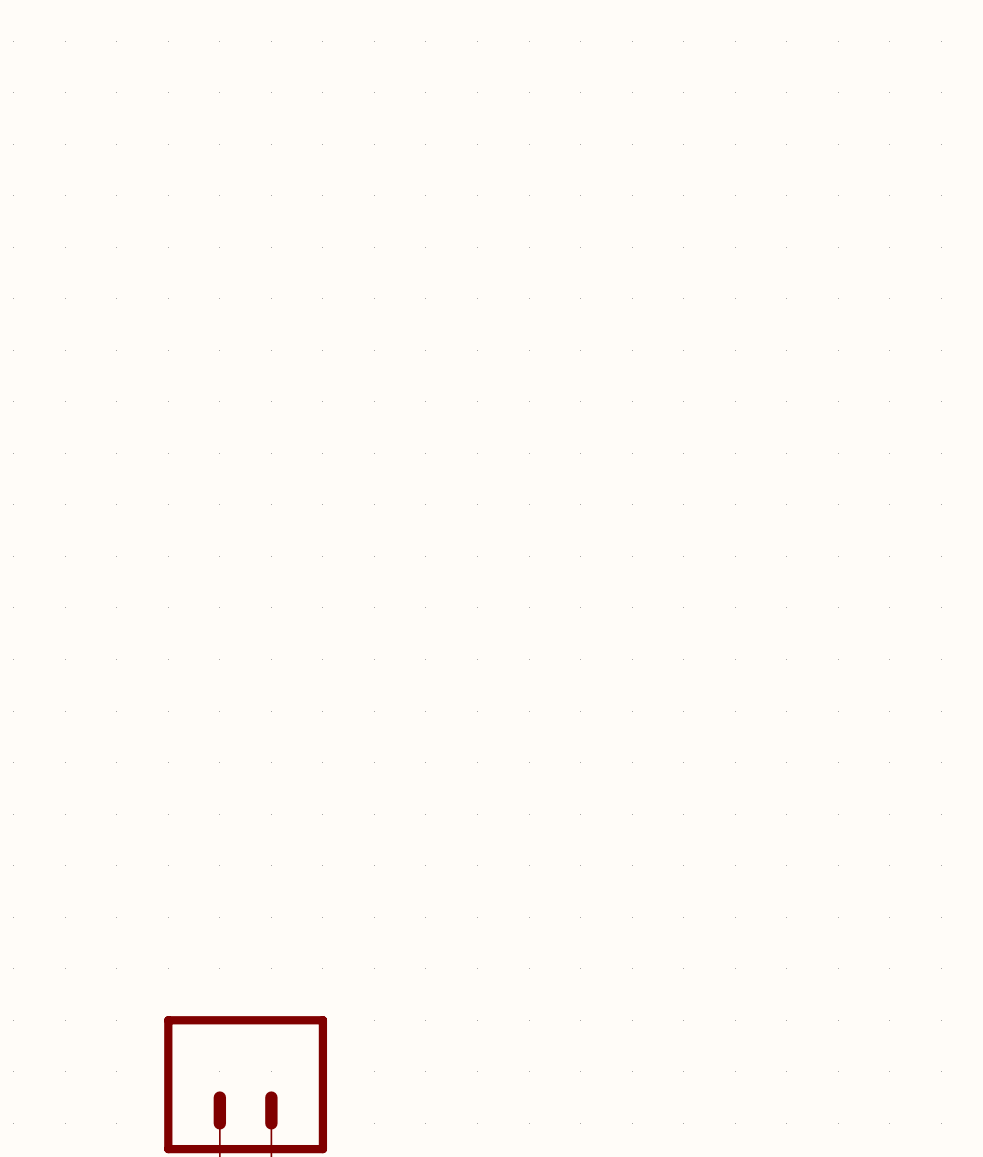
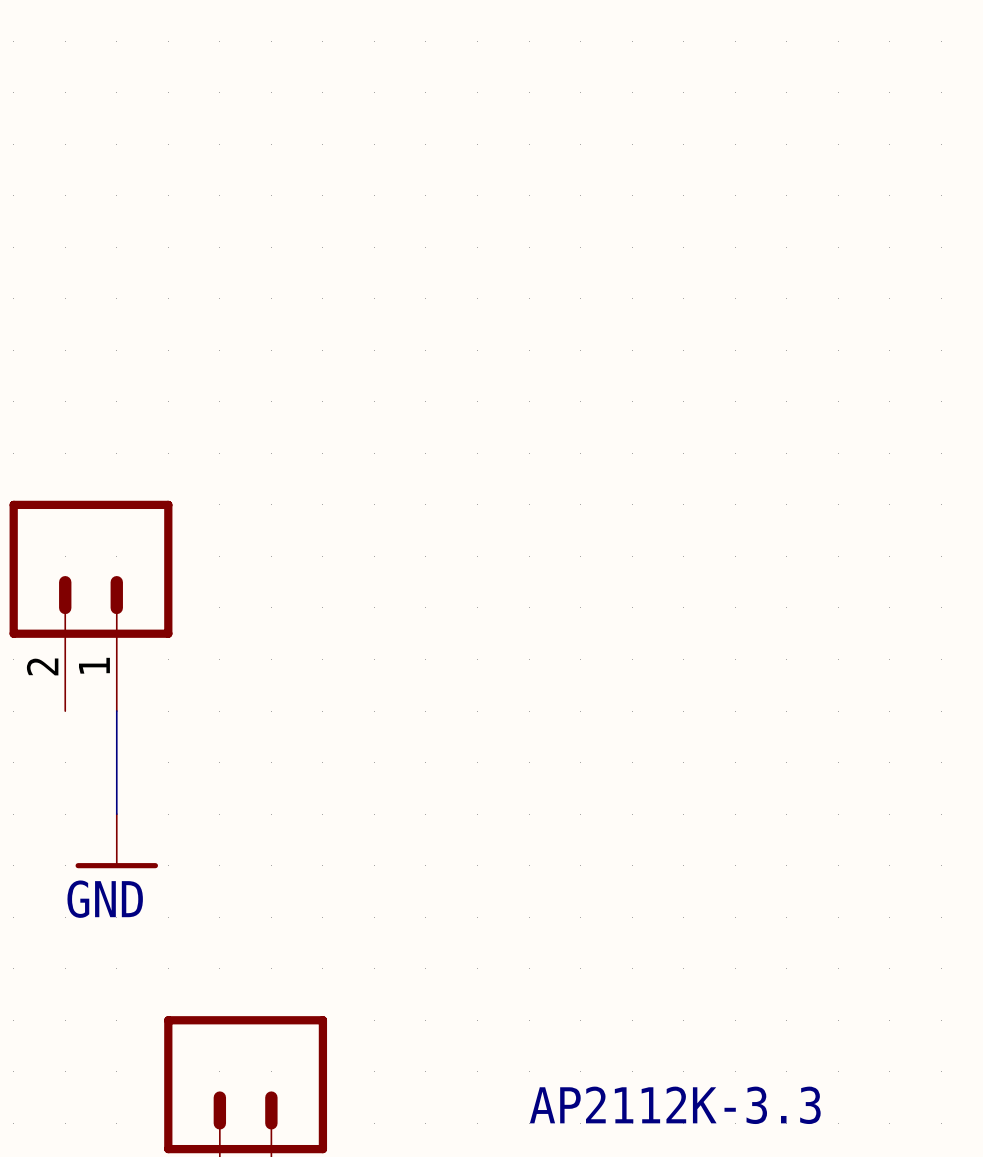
part: none -> (91, 605)
wire: none -> (116, 711) (116, 814)
power symbol: none -> GND (116, 841)
text: none -> AP2112K-3.3 (675, 1105)

